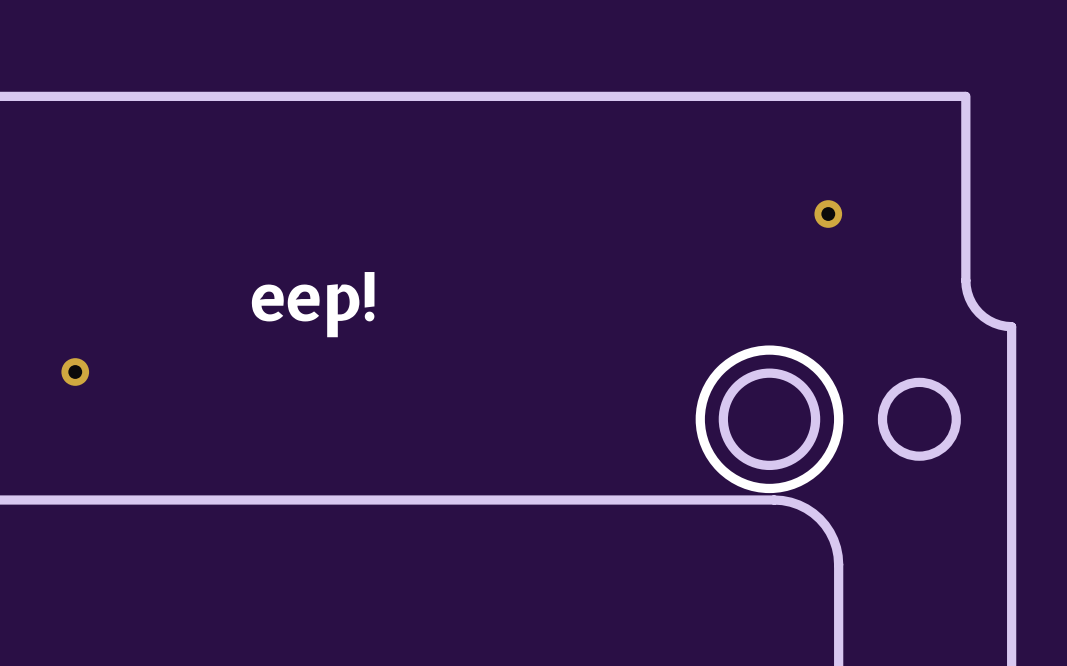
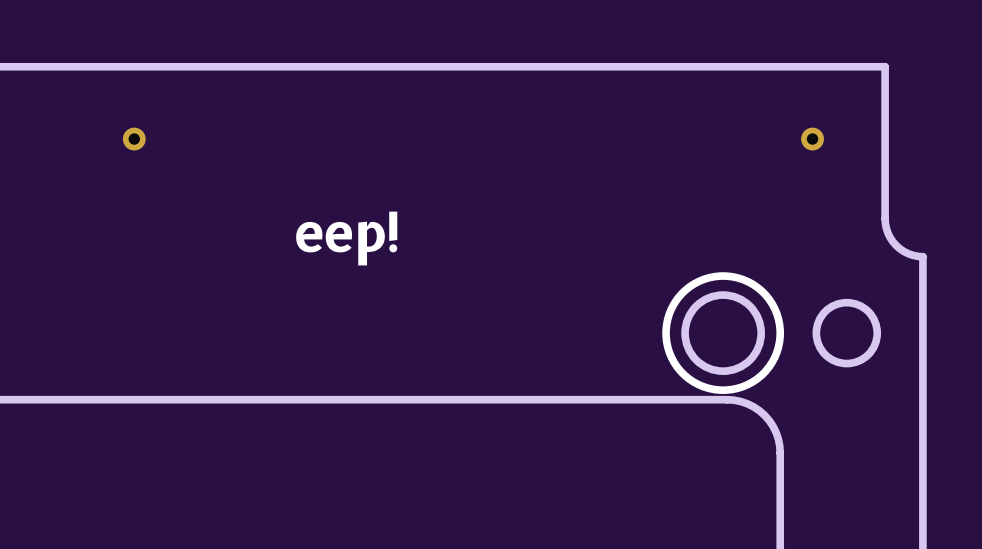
via position: (828, 214) -> (812, 139)
via position: (75, 372) -> (134, 139)

